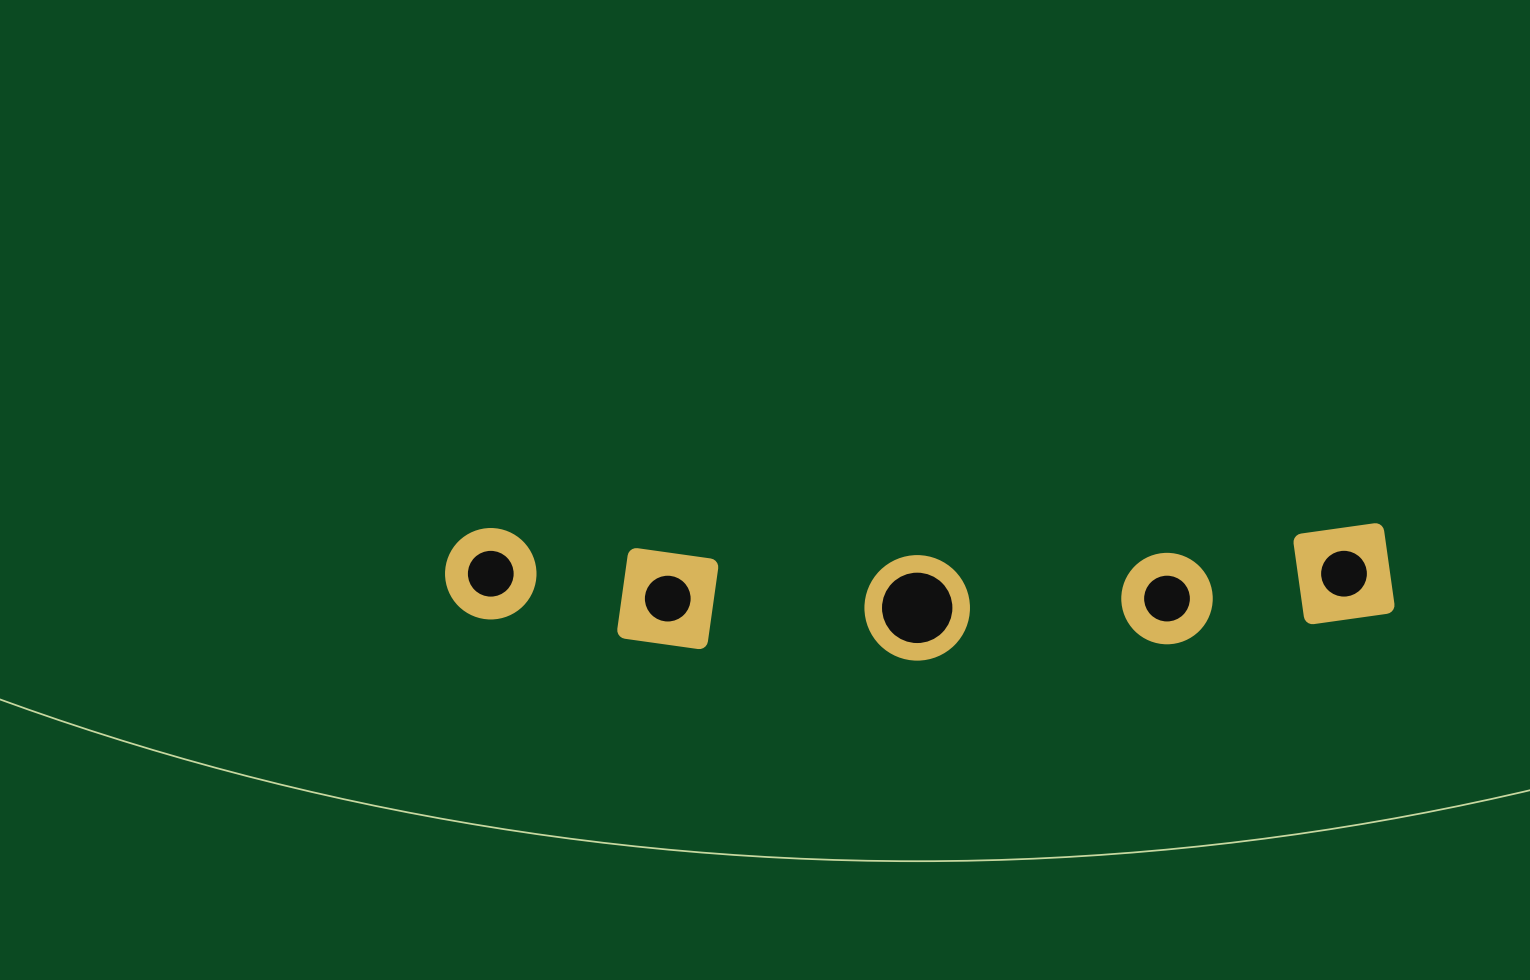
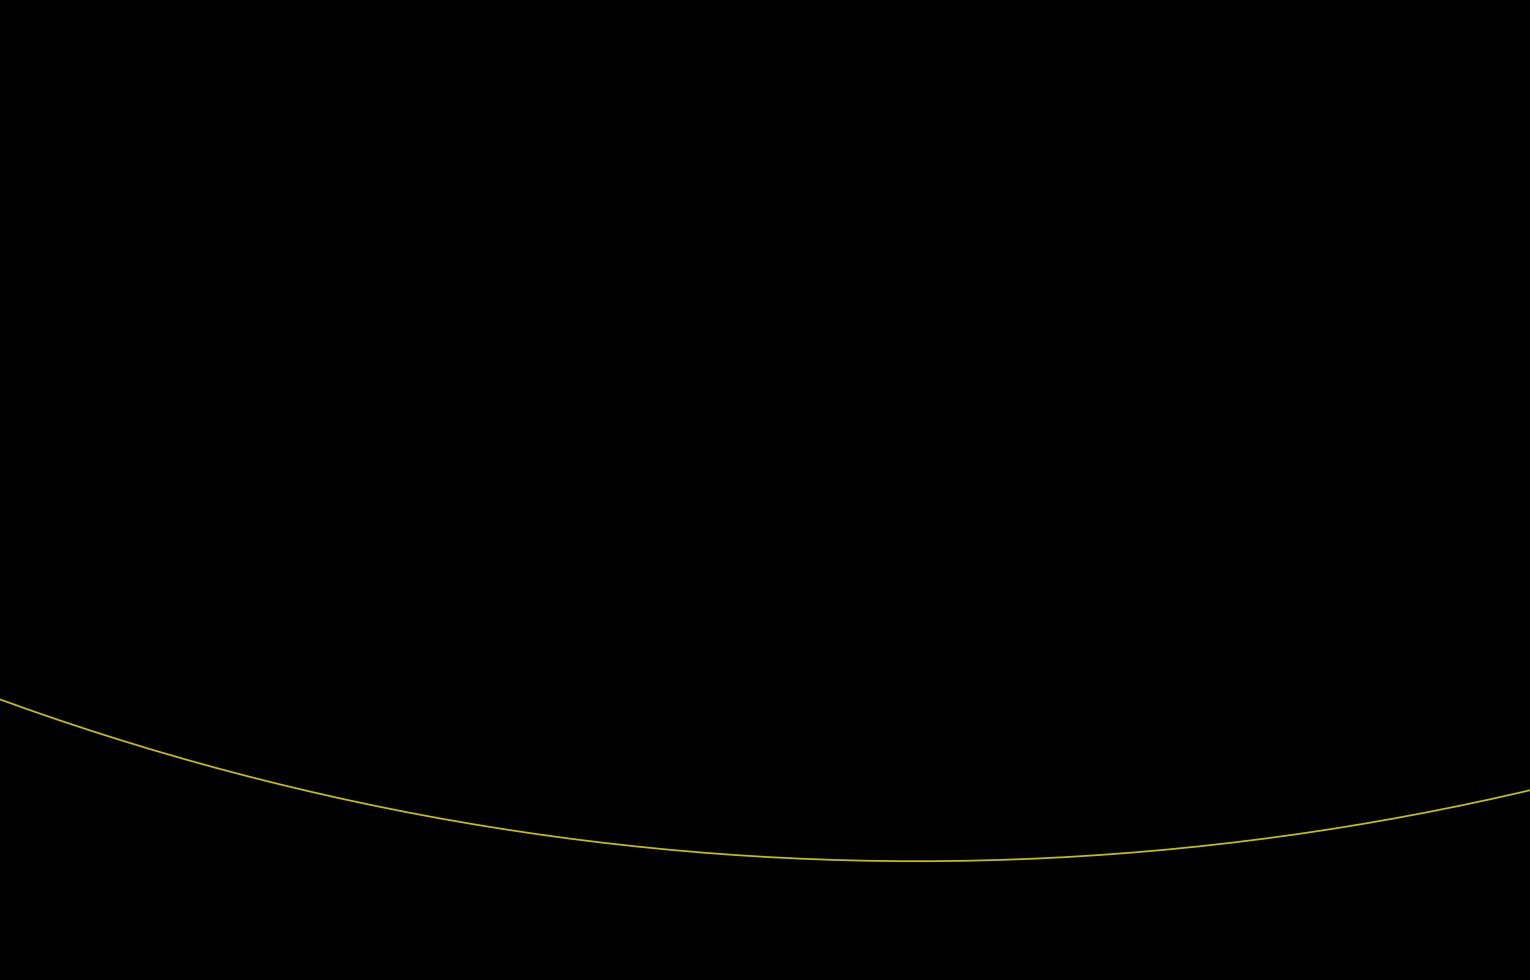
part: (1257, 583) -> none
part: (581, 588) -> none
part: (917, 607) -> none

